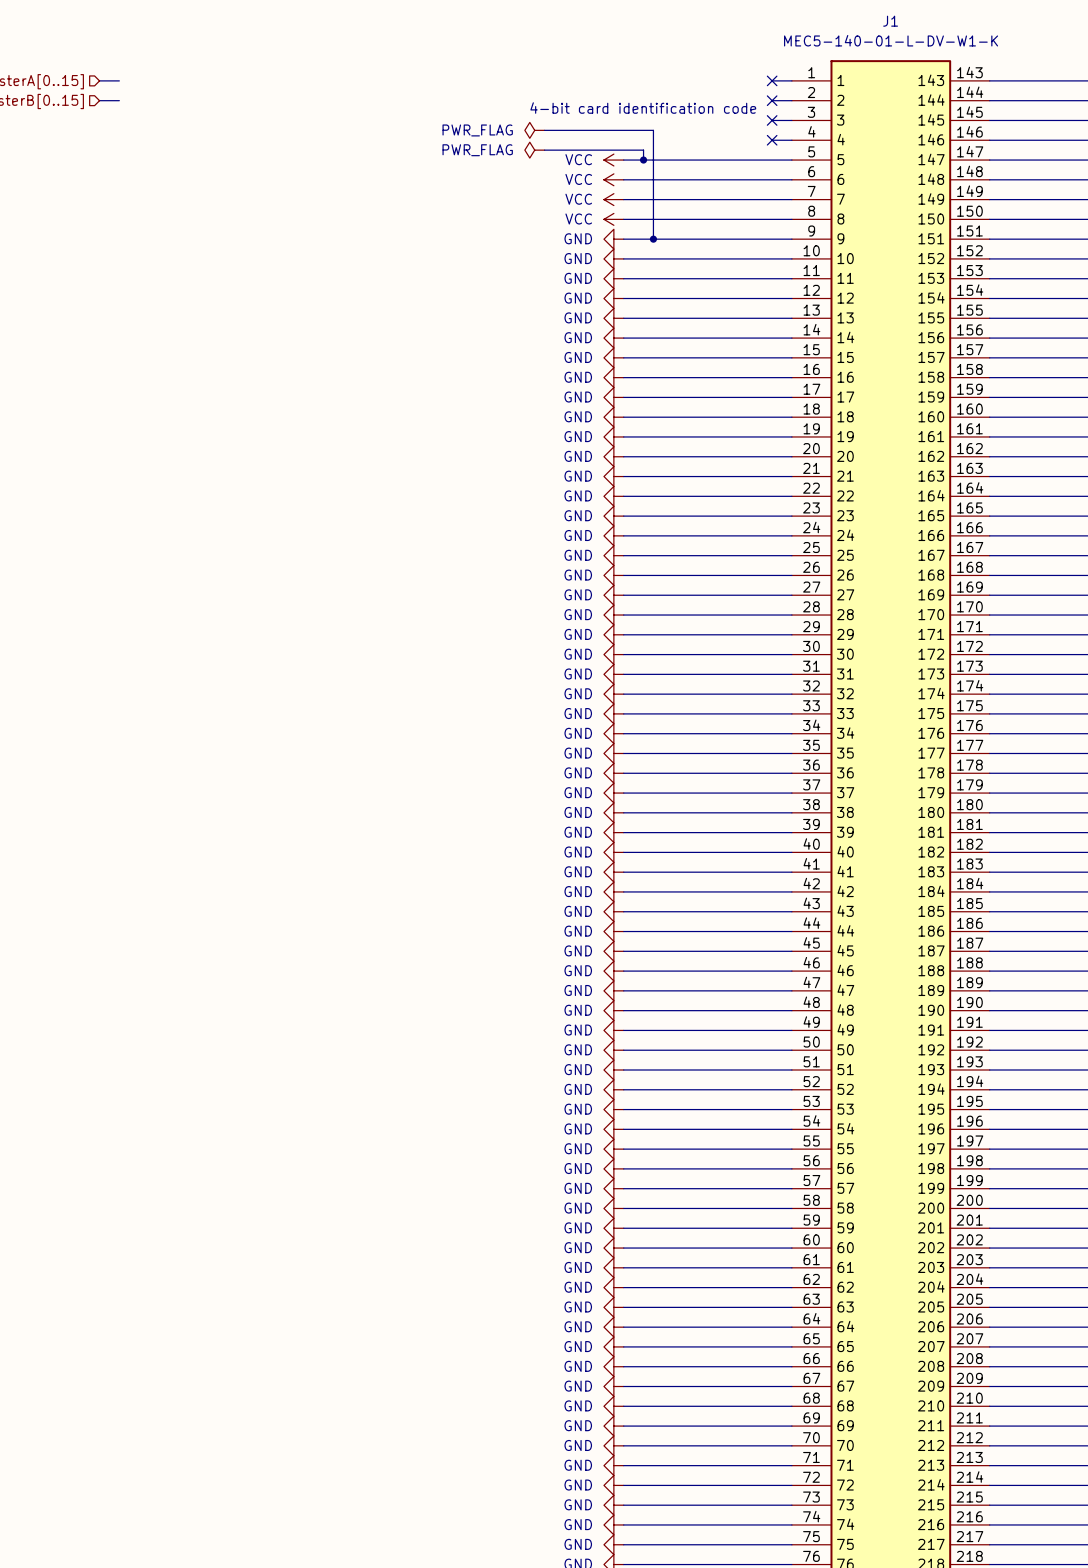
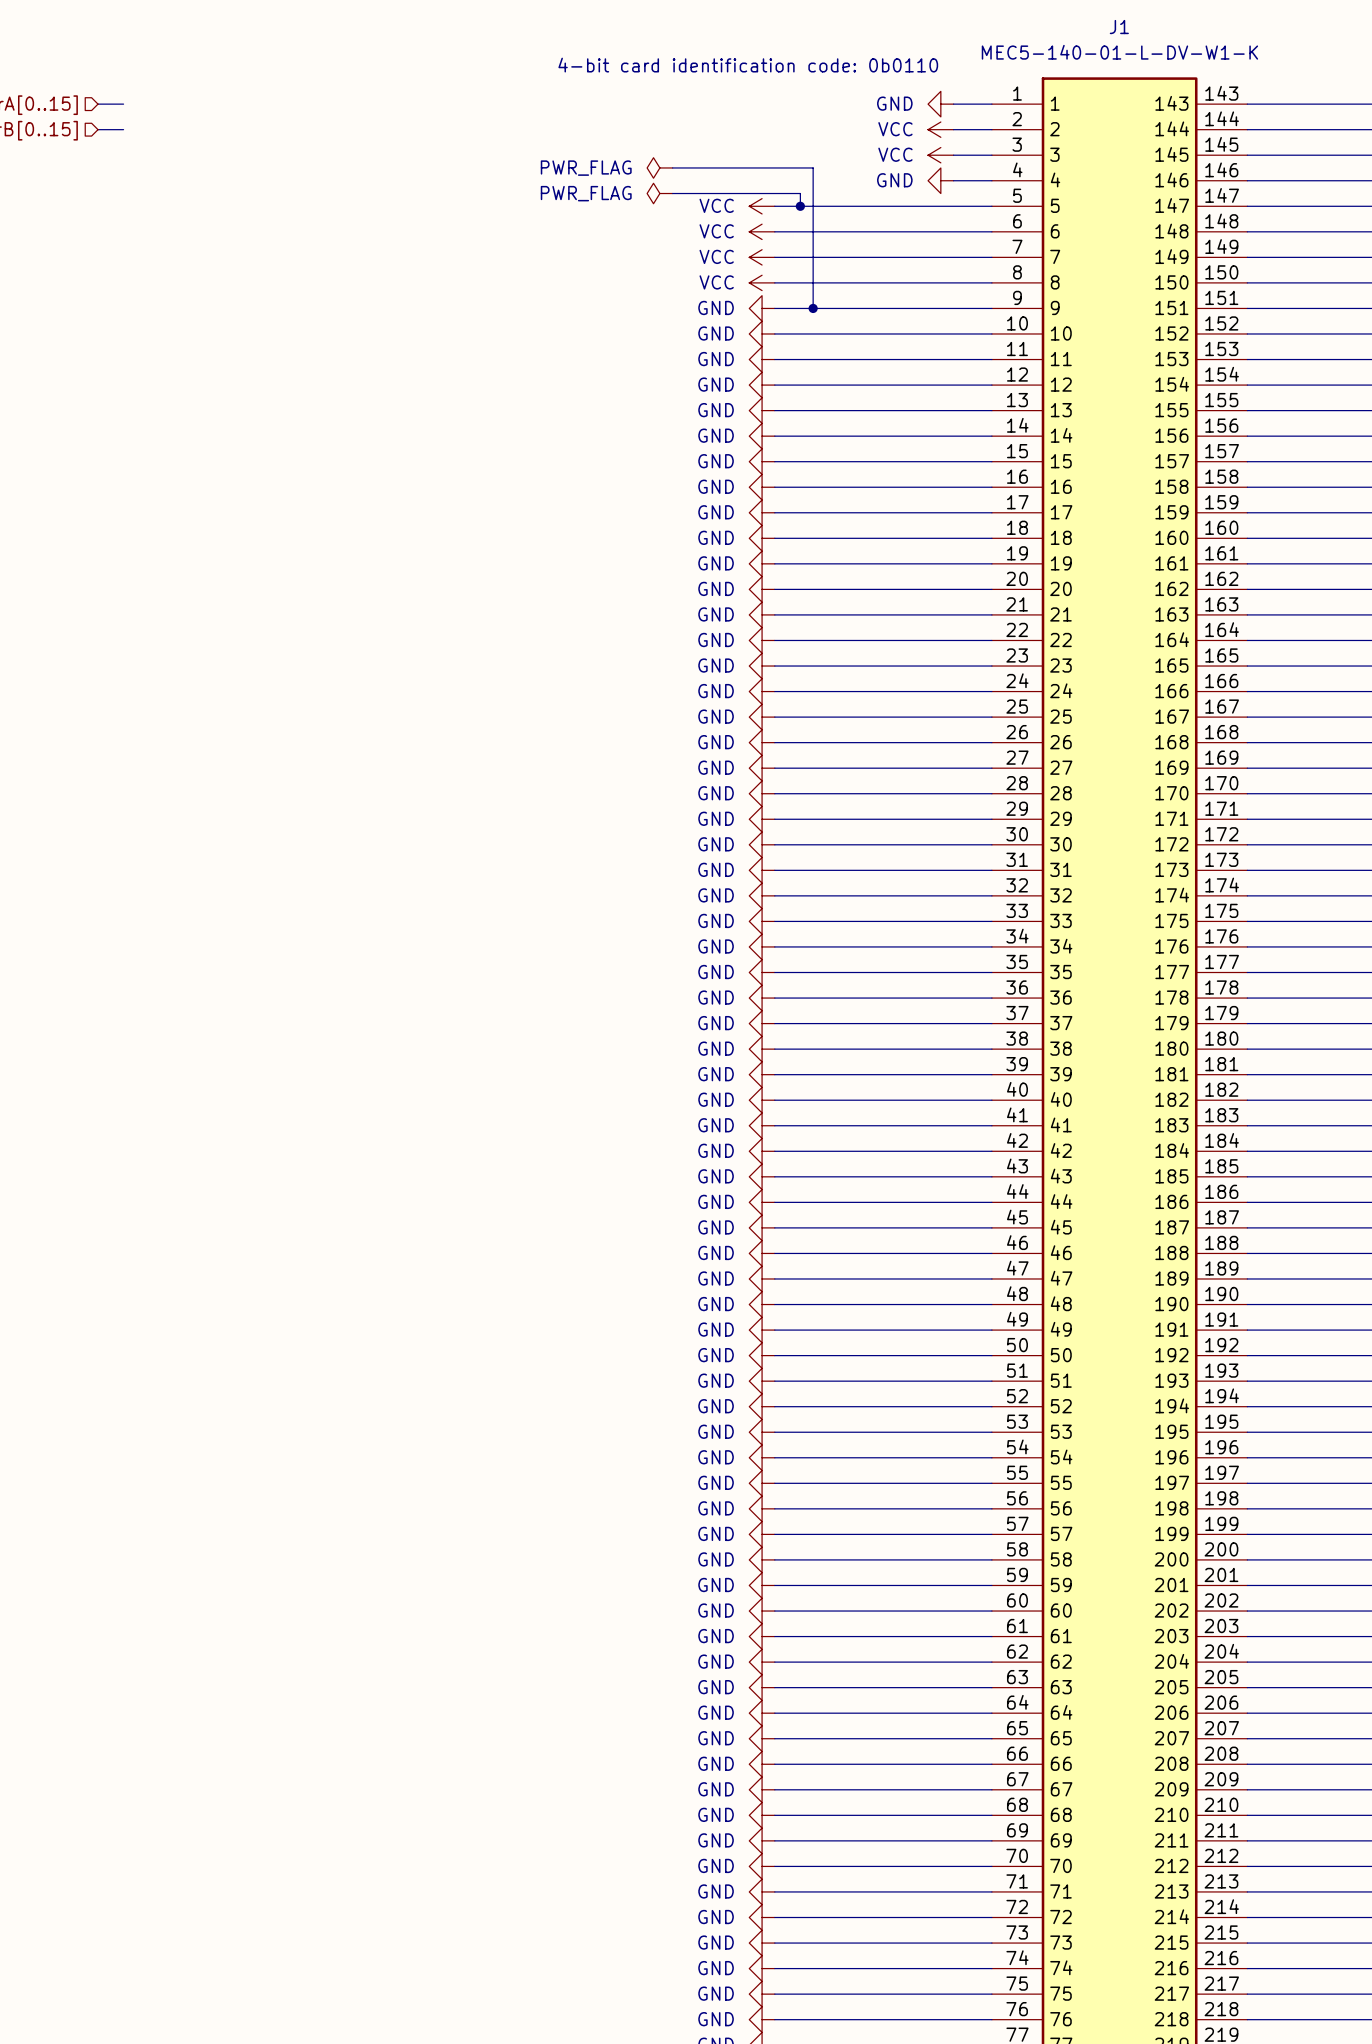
text: none -> 4-bit card identification code: 0b0110 (748, 65)
power symbol: none -> GND (940, 104)
wire: none -> (953, 104) (966, 104)
no-connect mark: (772, 80) -> none
power symbol: none -> VCC (940, 129)
wire: none -> (953, 129) (966, 129)
no-connect mark: (772, 100) -> none
text: 4-bit card identification code (643, 108) -> none
power symbol: none -> VCC (940, 155)
wire: none -> (953, 155) (966, 155)
no-connect mark: (772, 120) -> none
power symbol: none -> GND (940, 180)
wire: none -> (953, 180) (966, 180)
no-connect mark: (772, 140) -> none

